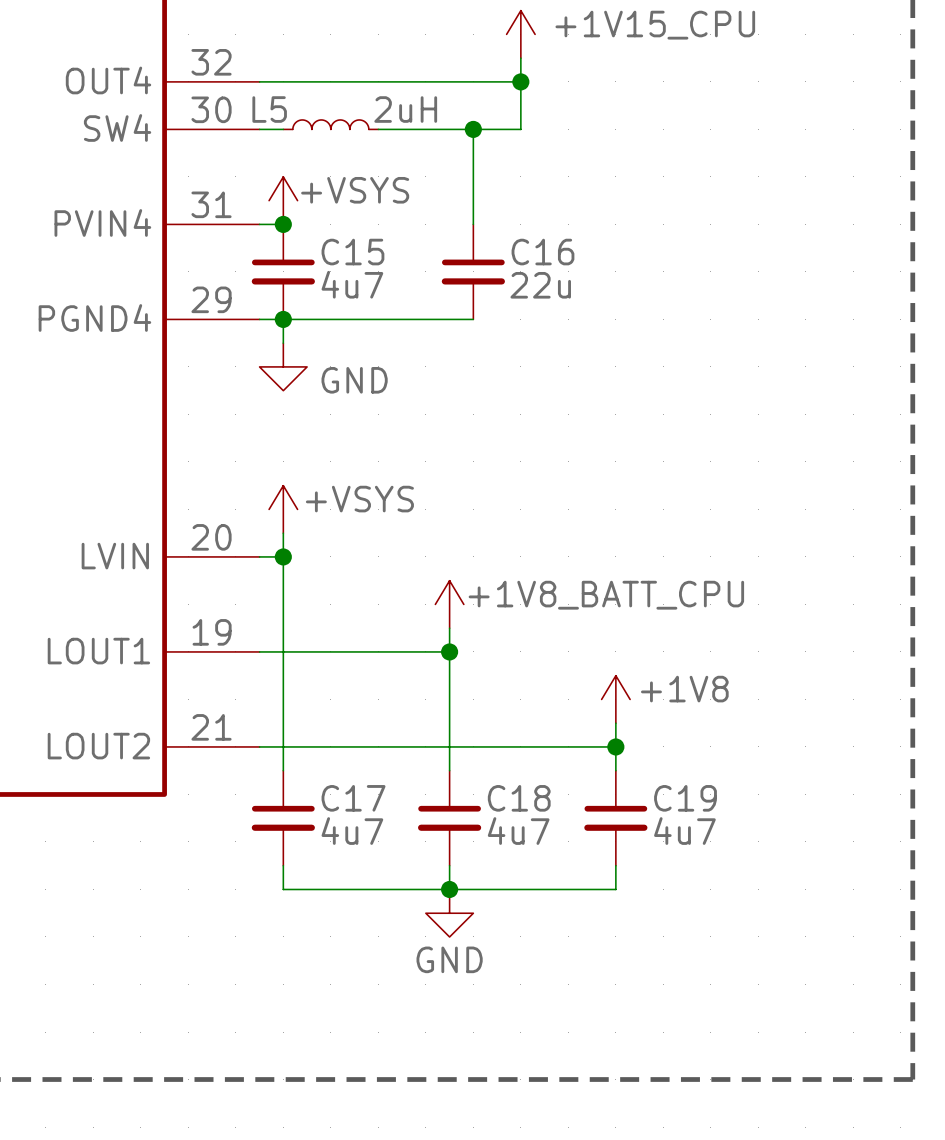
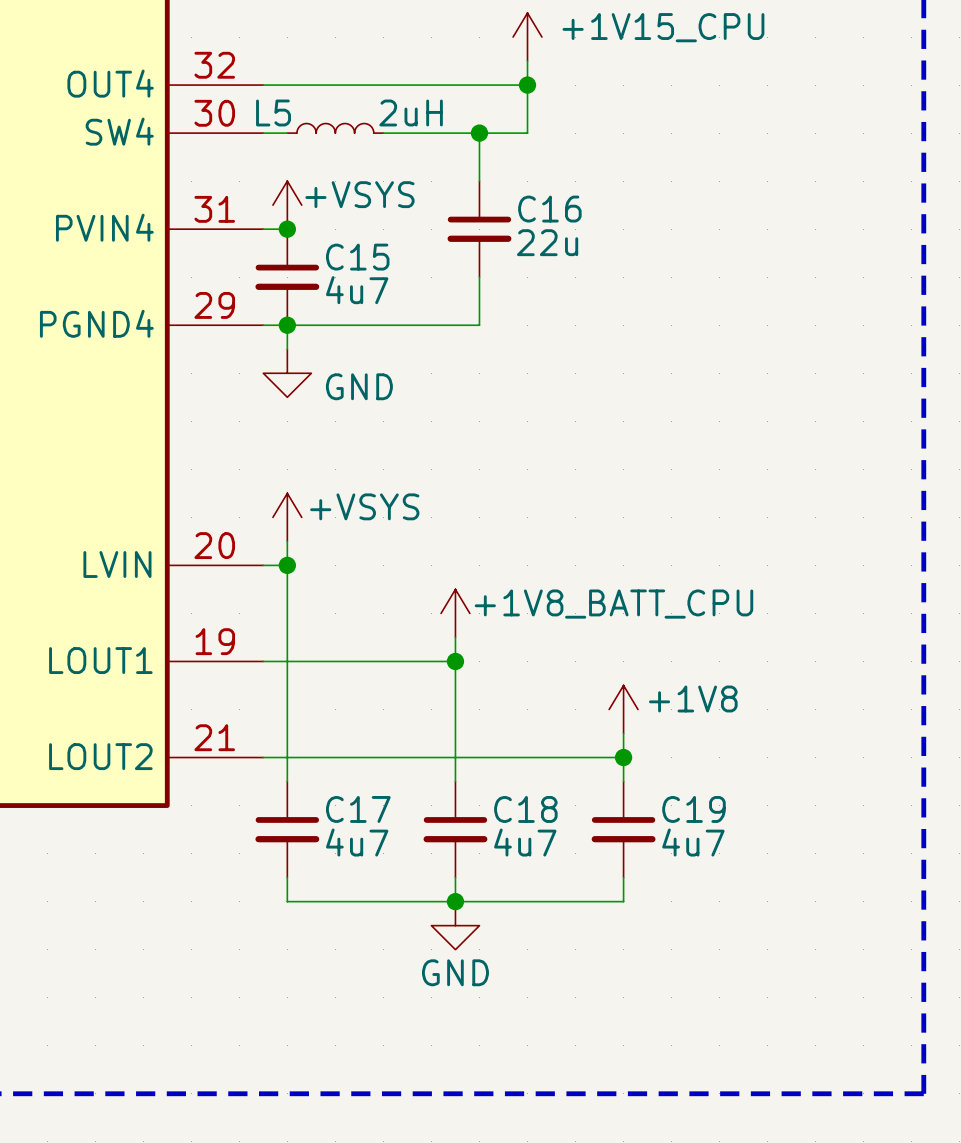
C16 position: (473, 271) -> (479, 229)

